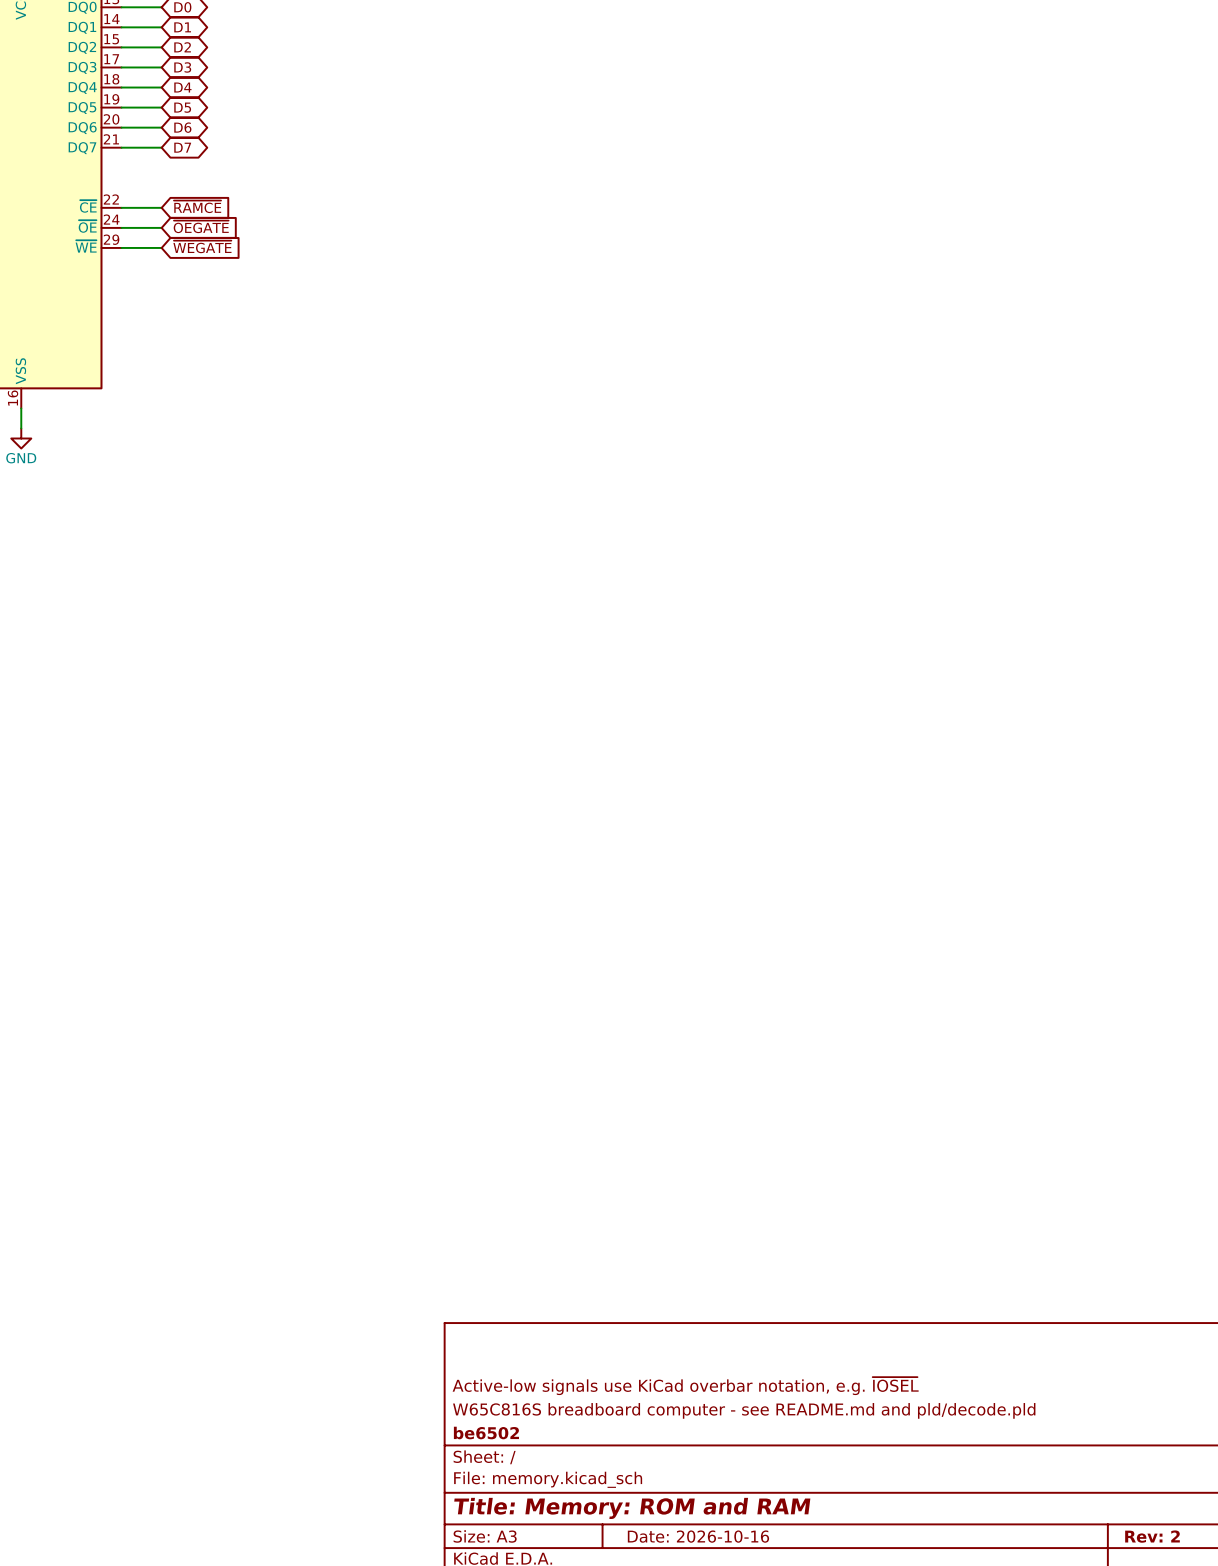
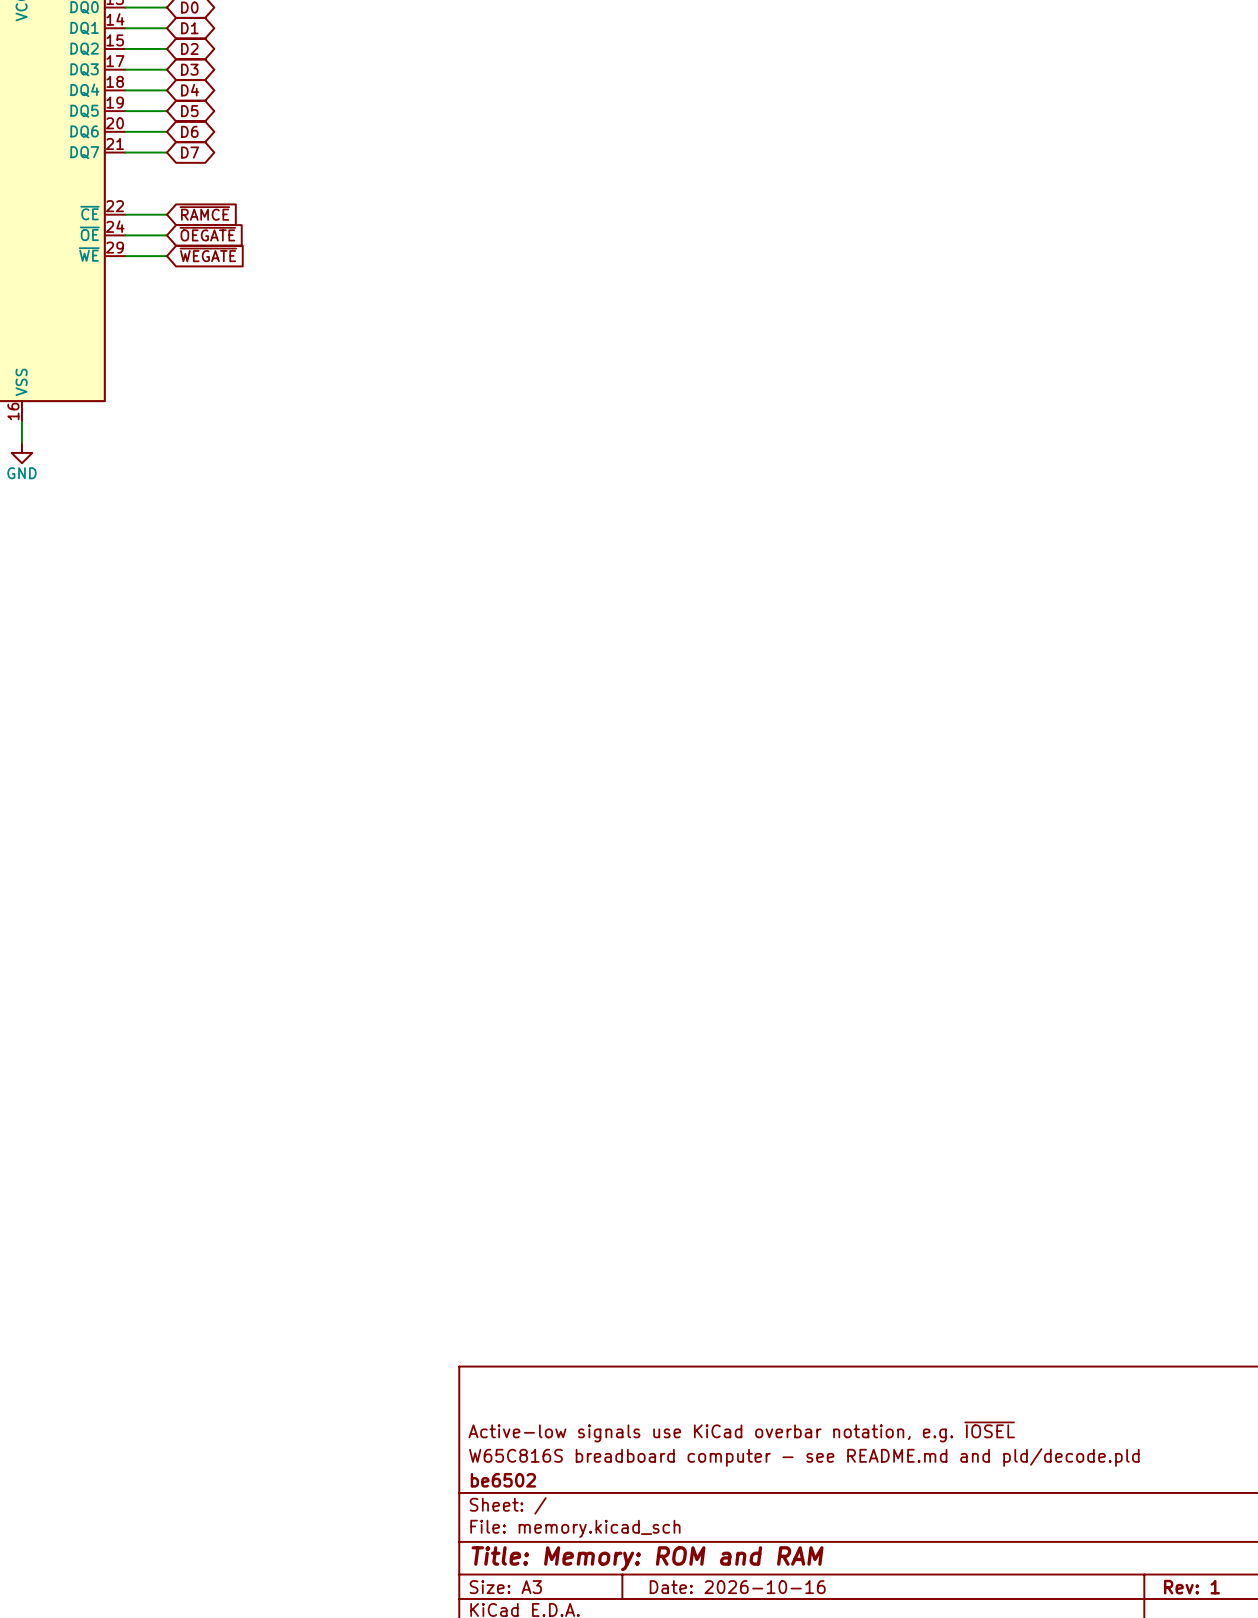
title block: Rev: 2 (1152, 1536) -> Rev: 1 (1191, 1587)

